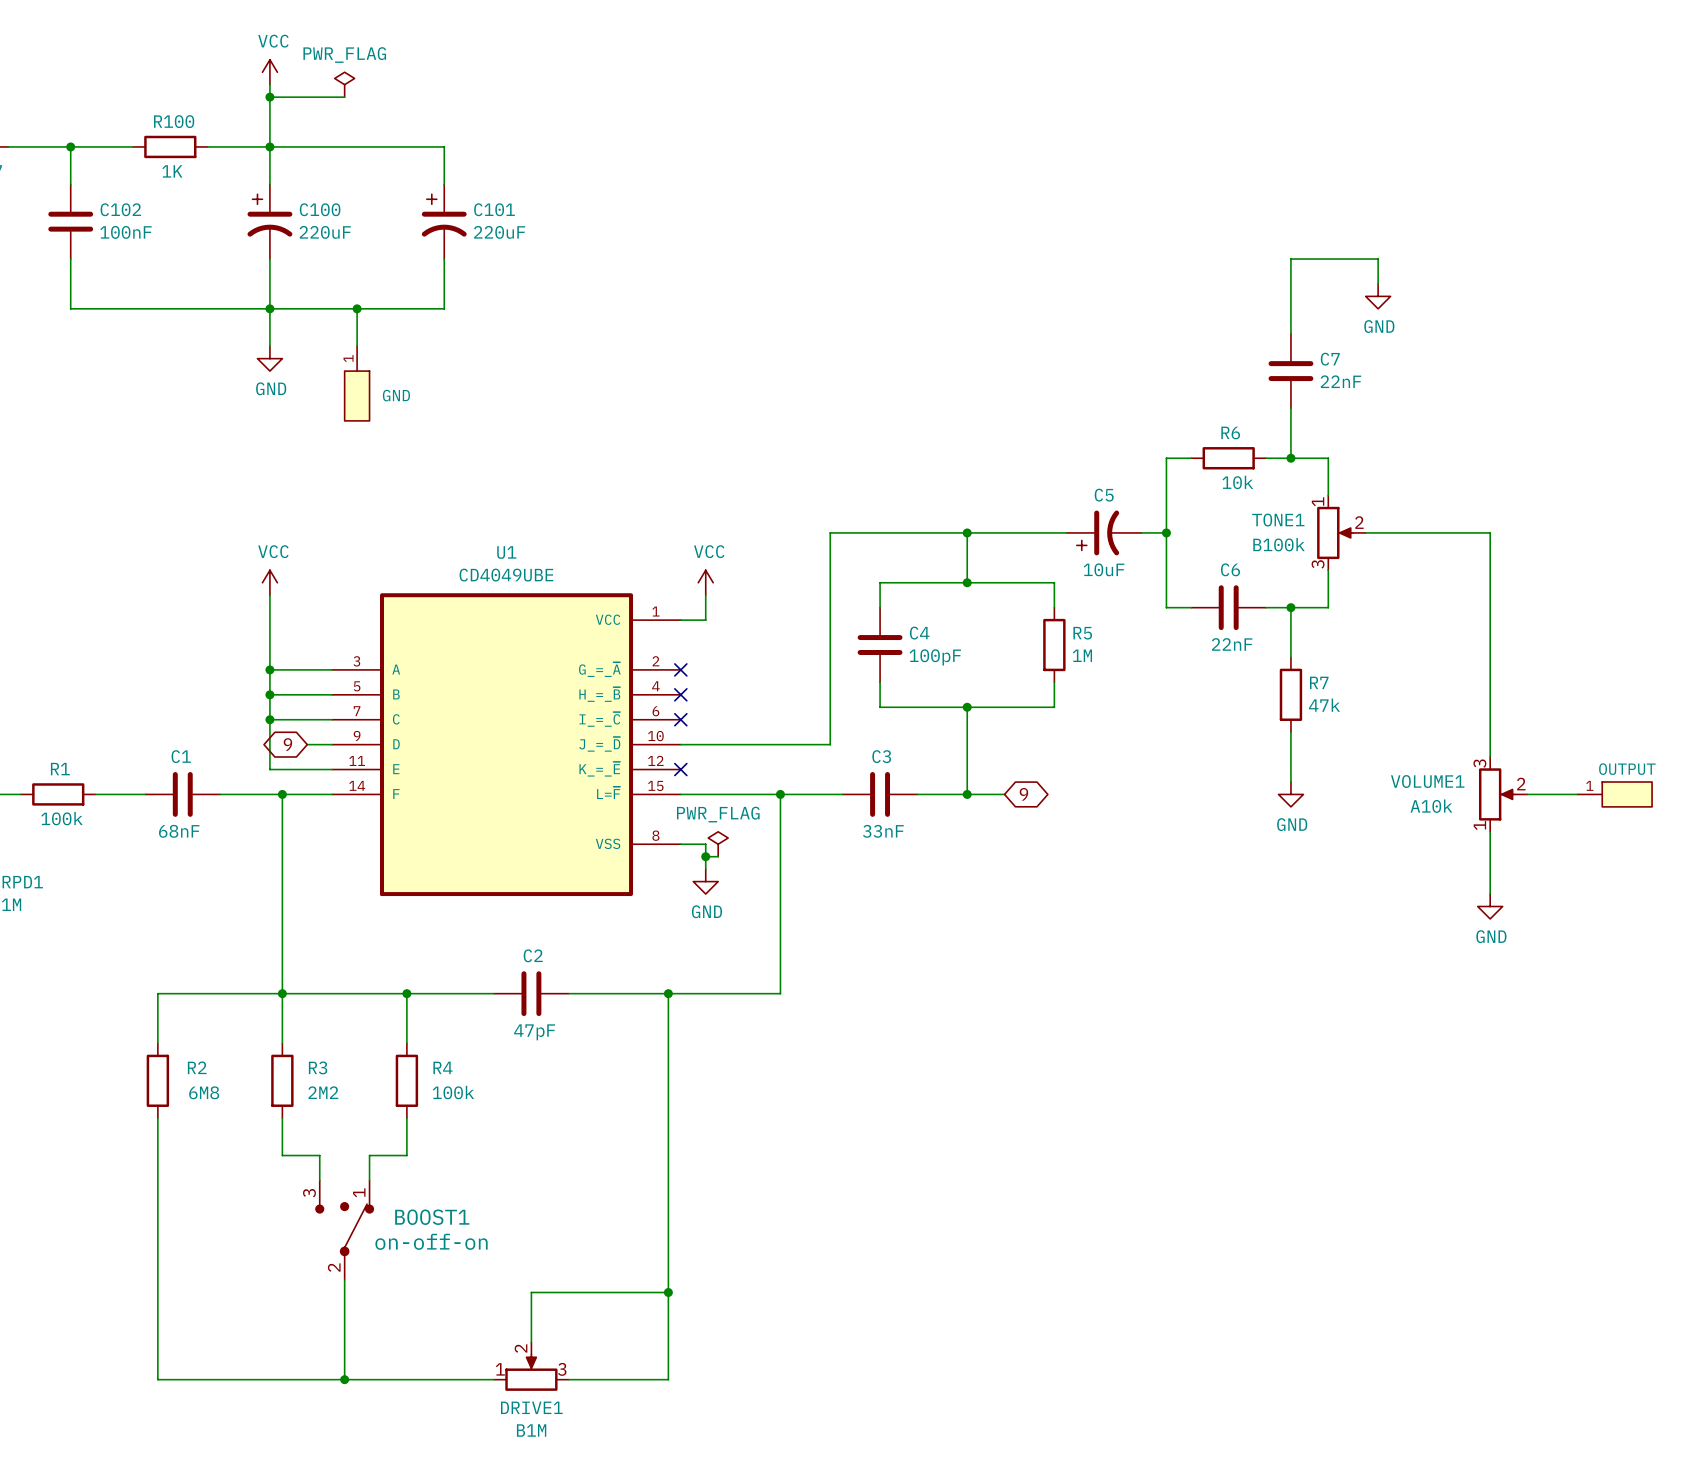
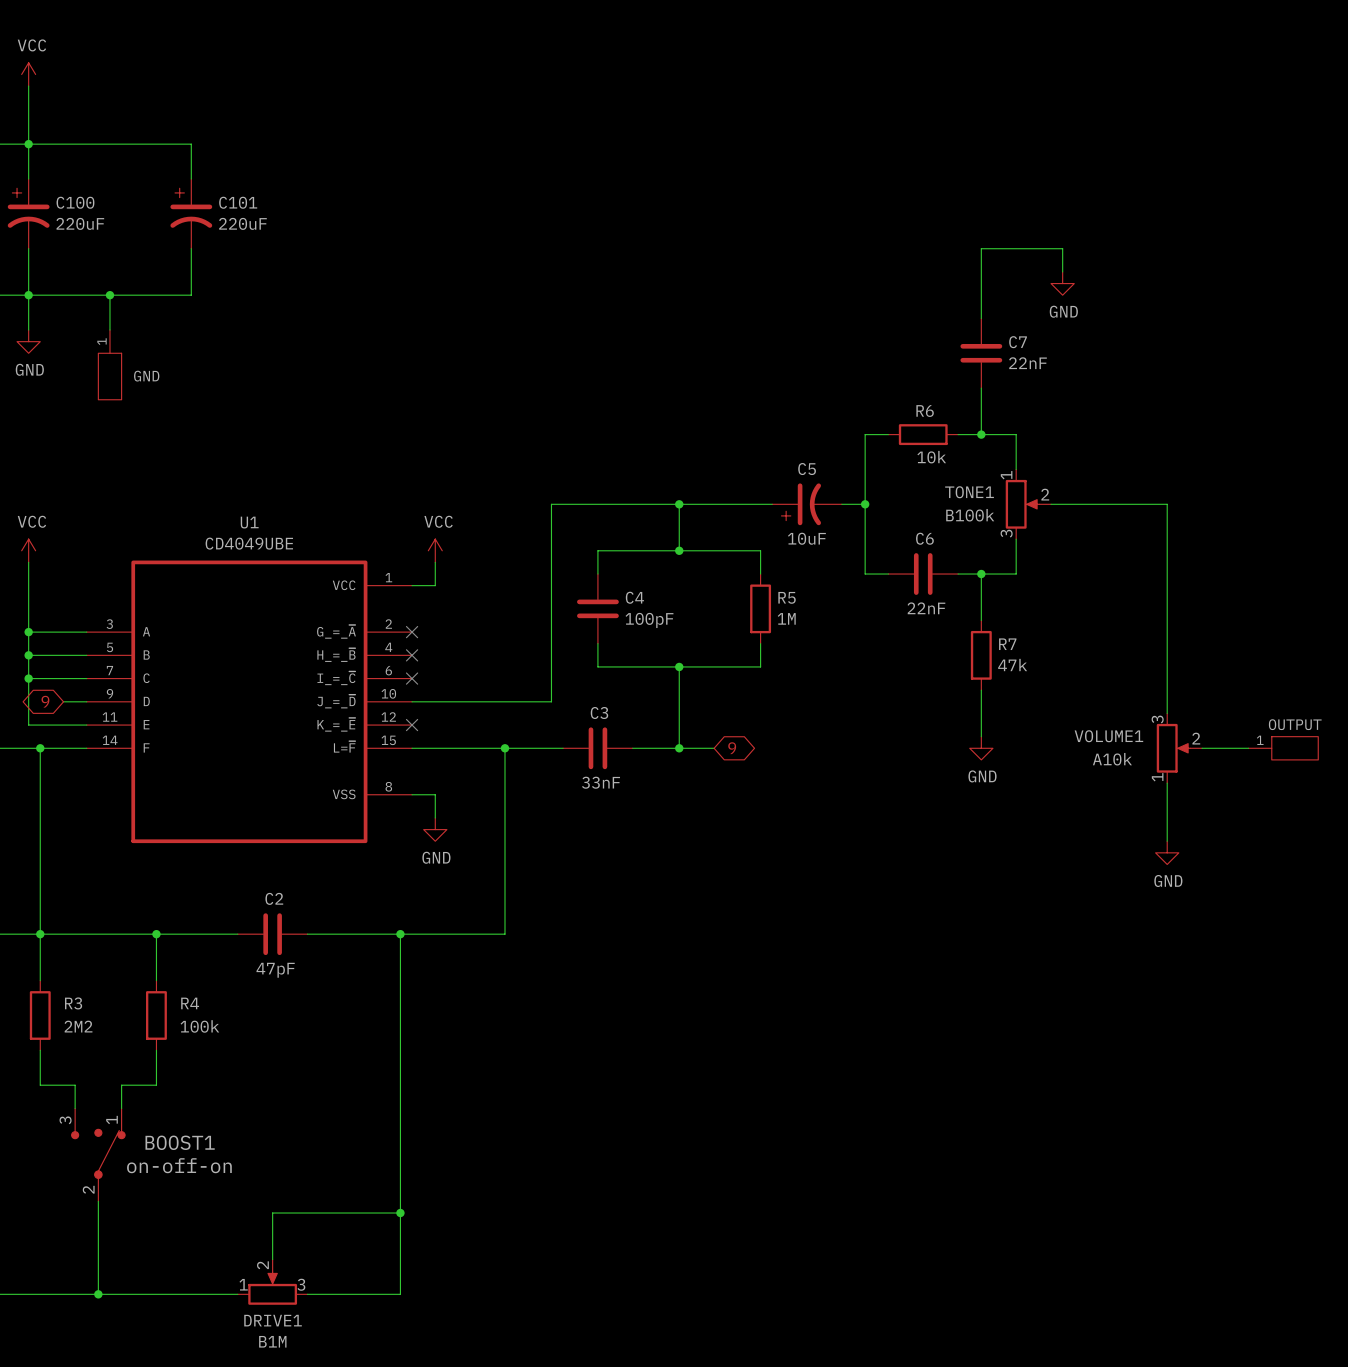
power symbol: PWR_FLAG (344, 84) -> none
wire: (269, 97) (344, 97) -> none
junction: (269, 97) -> none
power symbol: PWR_FLAG (718, 844) -> none
wire: (705, 856) (718, 856) -> none
junction: (705, 856) -> none

